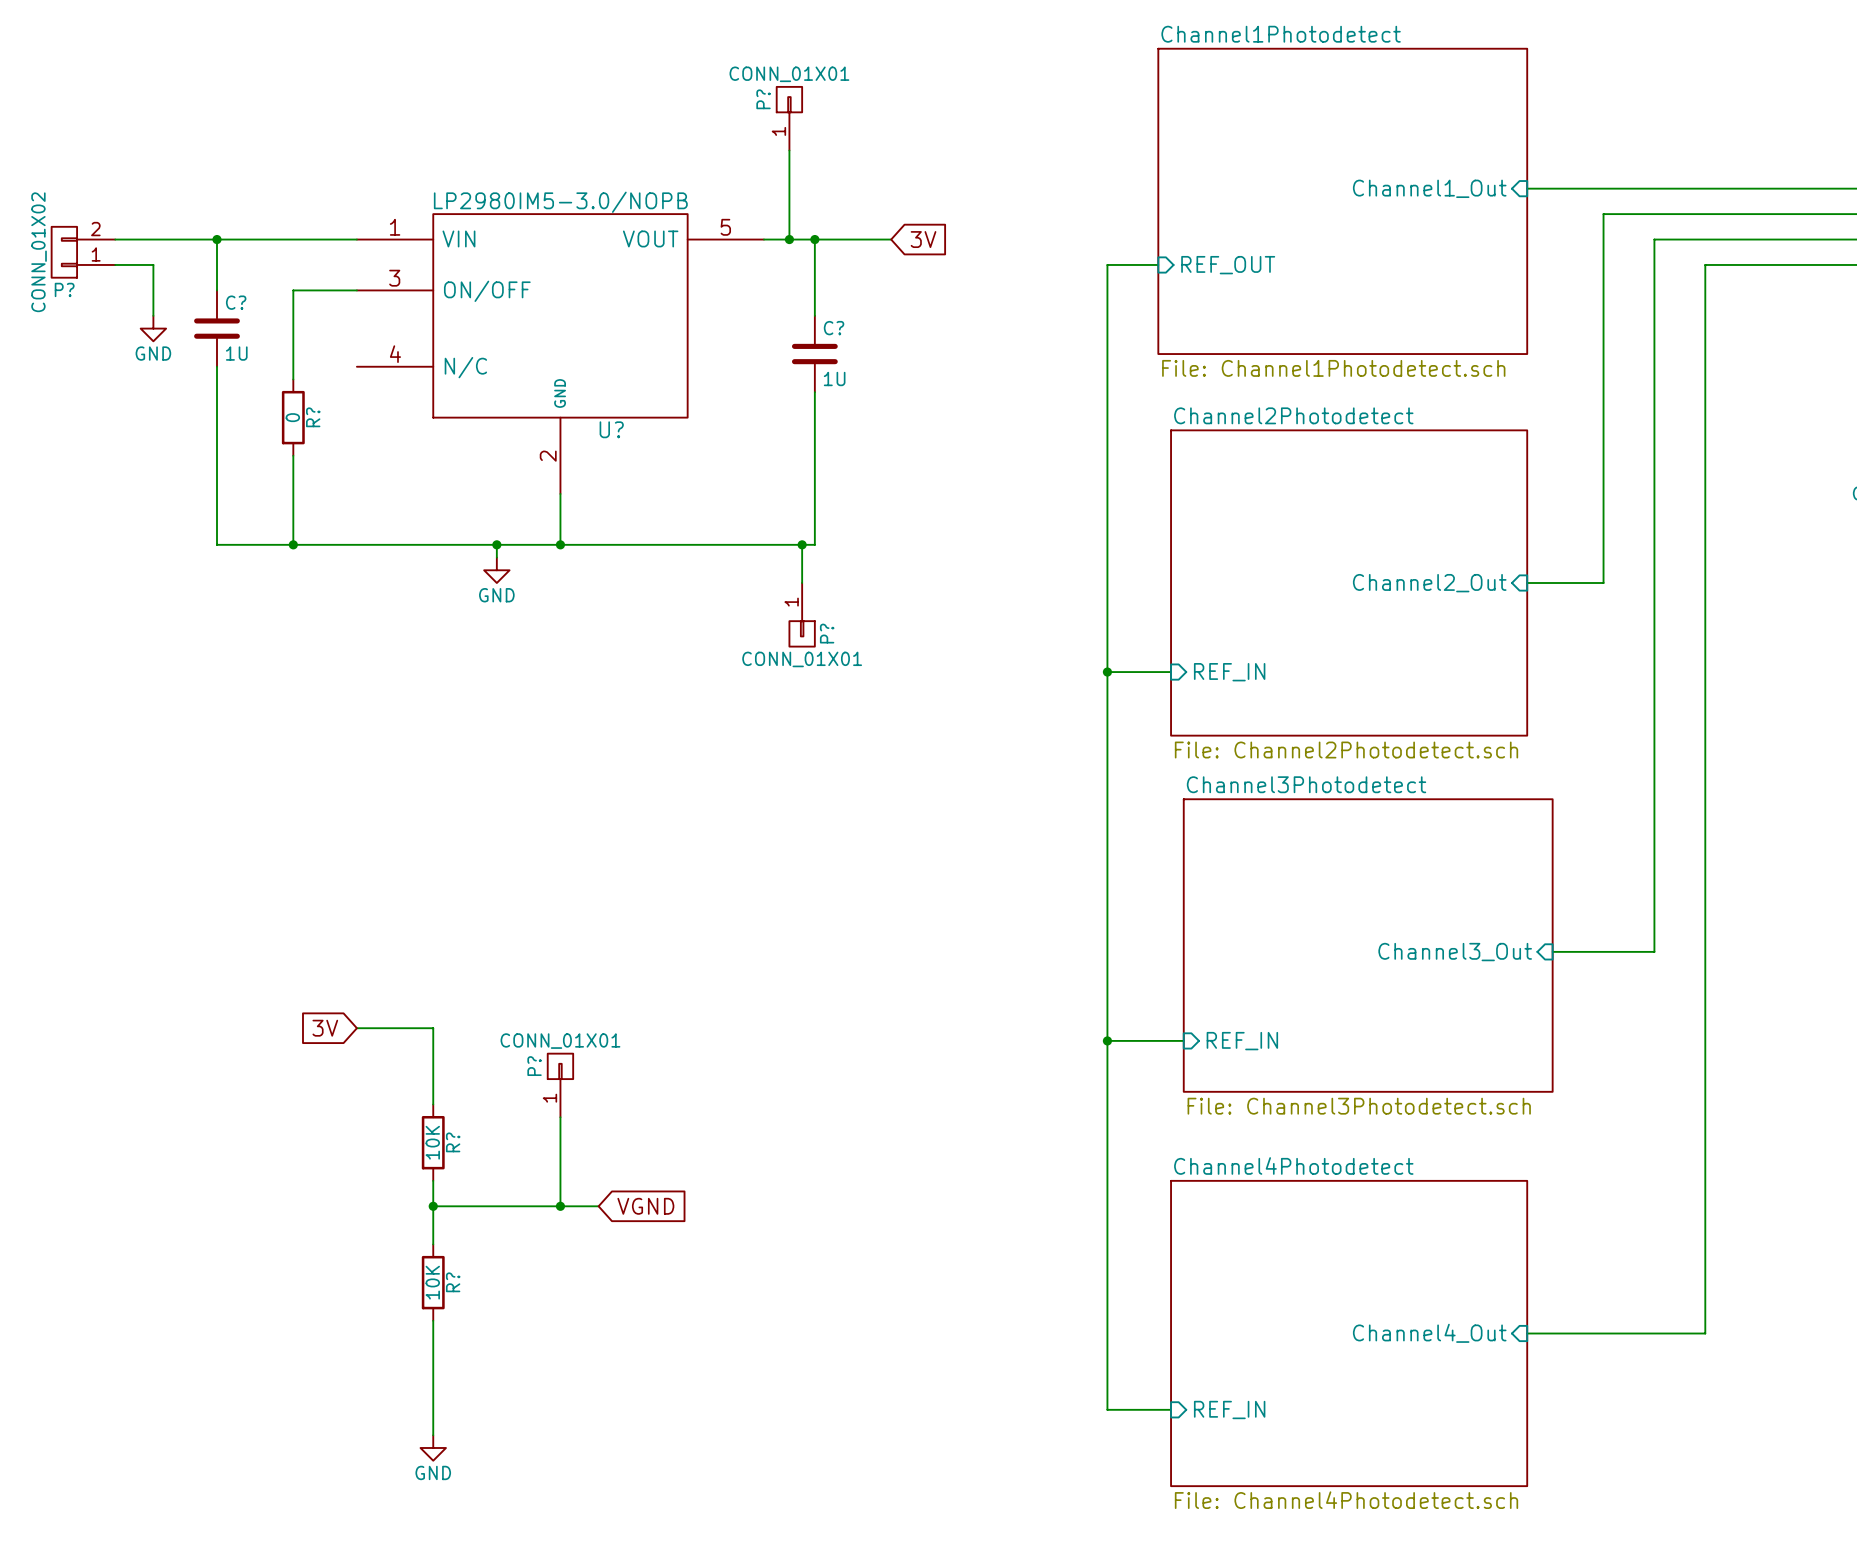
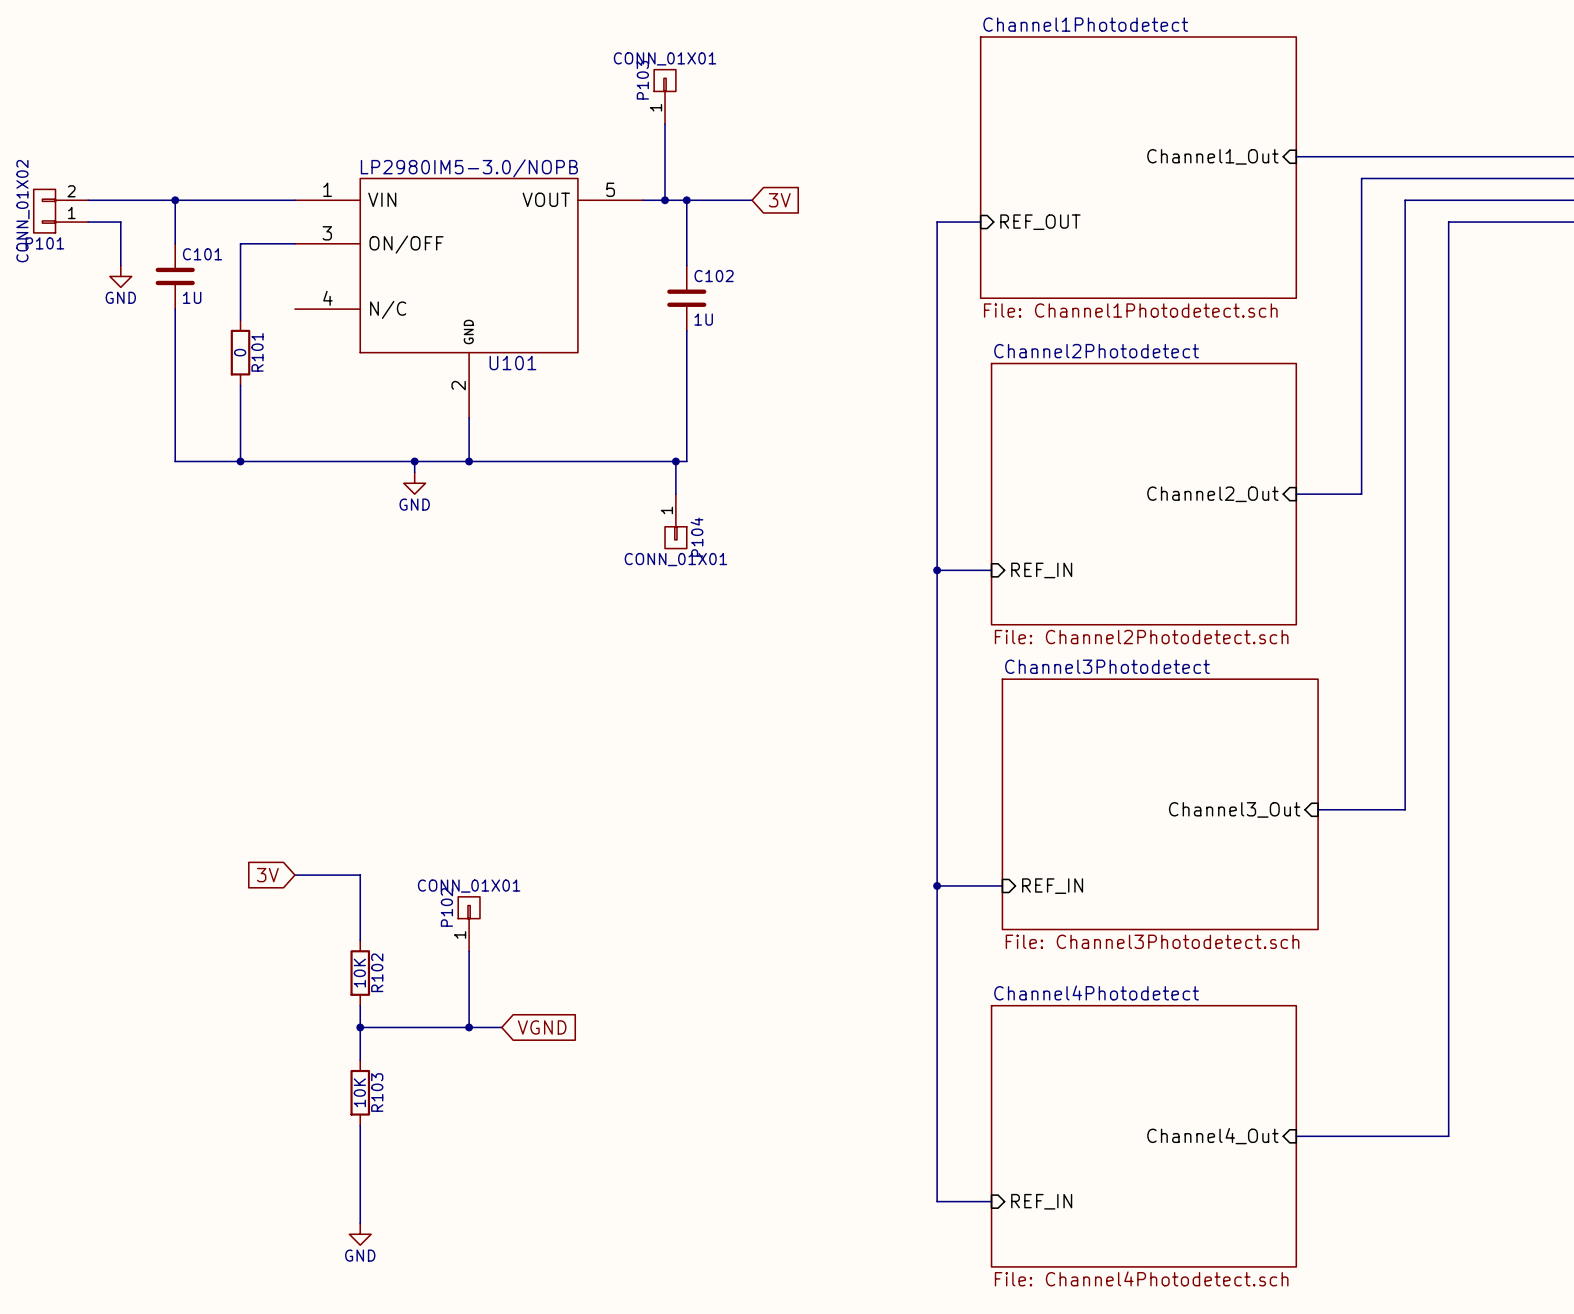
P? name: P? (763, 99) -> P103 (642, 80)
P? name: P? (64, 289) -> P101 (44, 243)
C? name: C? (236, 302) -> C101 (202, 254)
C? name: C? (834, 328) -> C102 (714, 276)
R? name: R? (313, 417) -> R101 (257, 352)
U? name: U? (611, 429) -> U101 (512, 363)
P? name: P? (827, 633) -> P104 (697, 537)
P? name: P? (534, 1066) -> P102 (446, 907)
R? name: R? (453, 1142) -> R102 (377, 972)
R? name: R? (453, 1282) -> R103 (377, 1092)

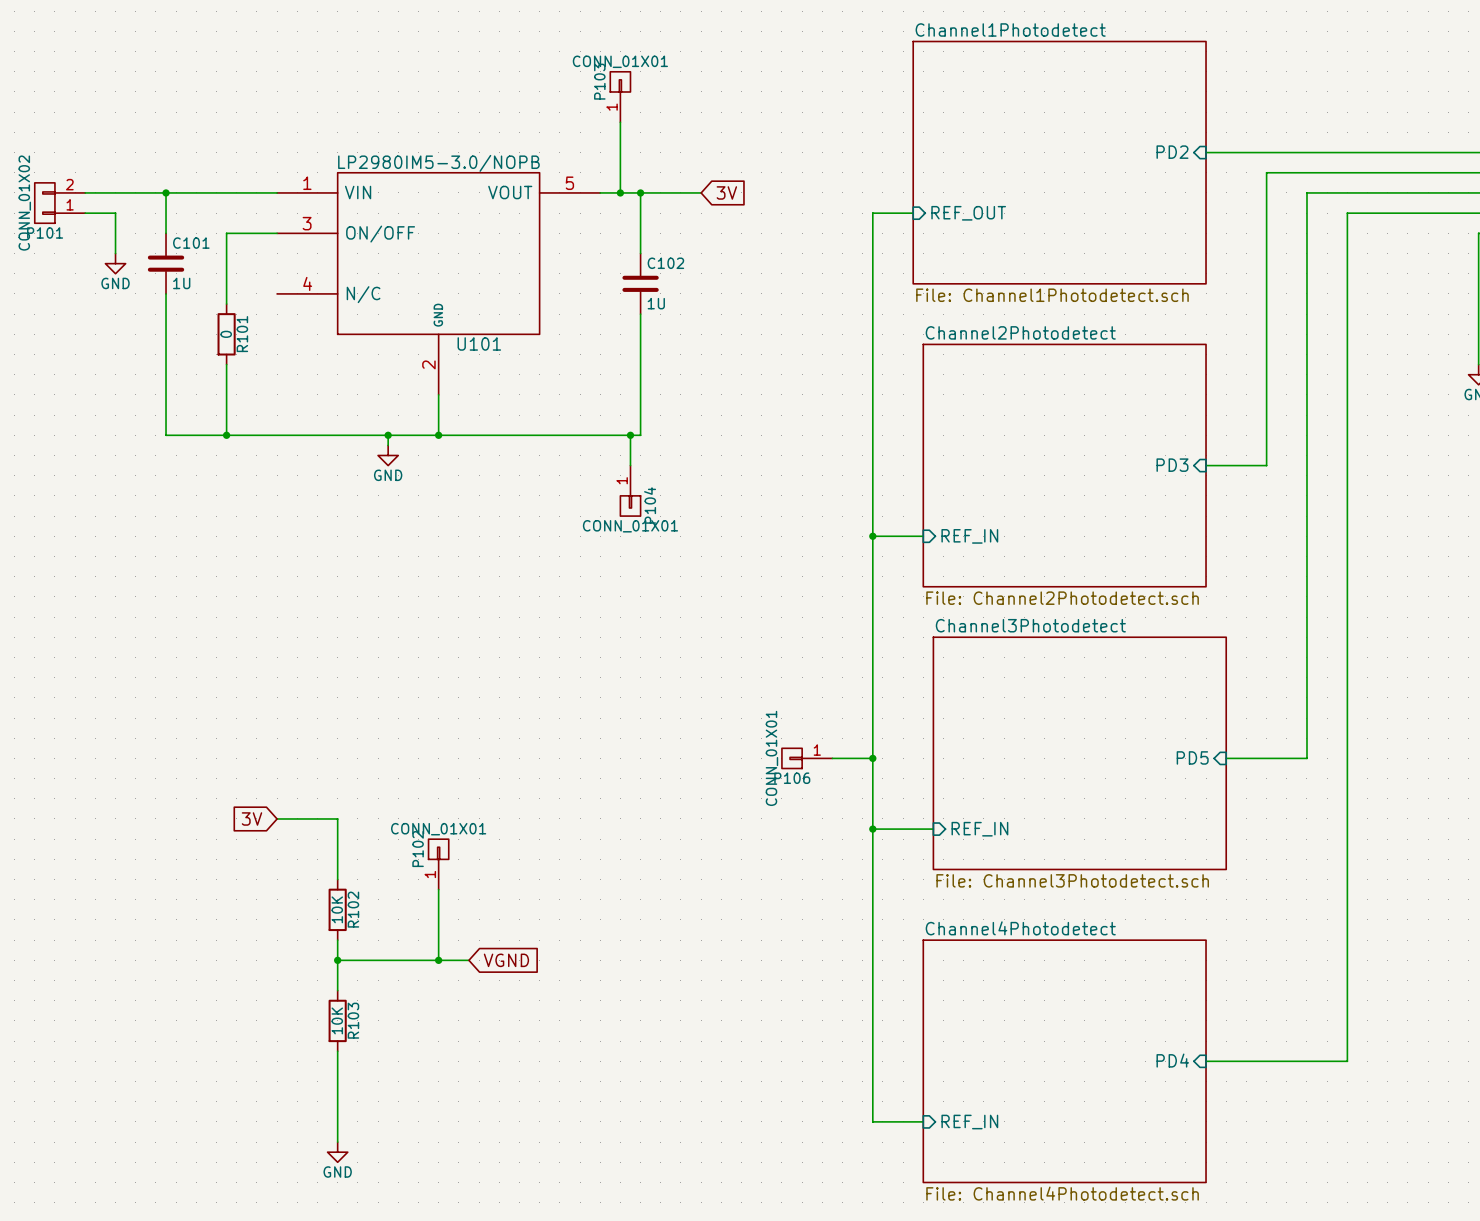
sheet pin: Channel1_Out (1212, 156) -> PD2 (1172, 152)
sheet pin: Channel2_Out (1212, 494) -> PD3 (1172, 465)
P106: none -> CONN_01X01 (807, 758)
wire: none -> (832, 758) (872, 758)
junction: none -> (872, 758)
sheet pin: Channel3_Out (1234, 809) -> PD5 (1192, 757)
sheet pin: Channel4_Out (1212, 1136) -> PD4 (1172, 1060)

